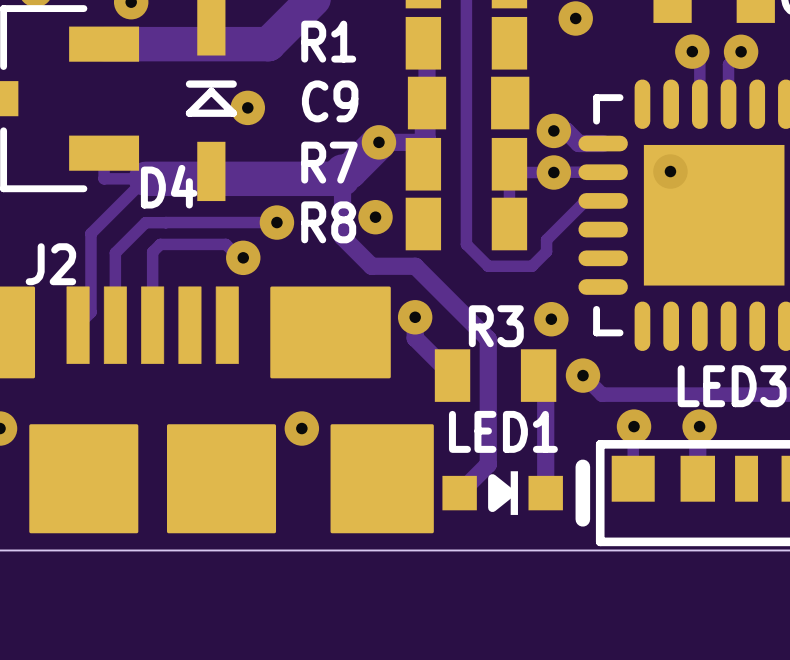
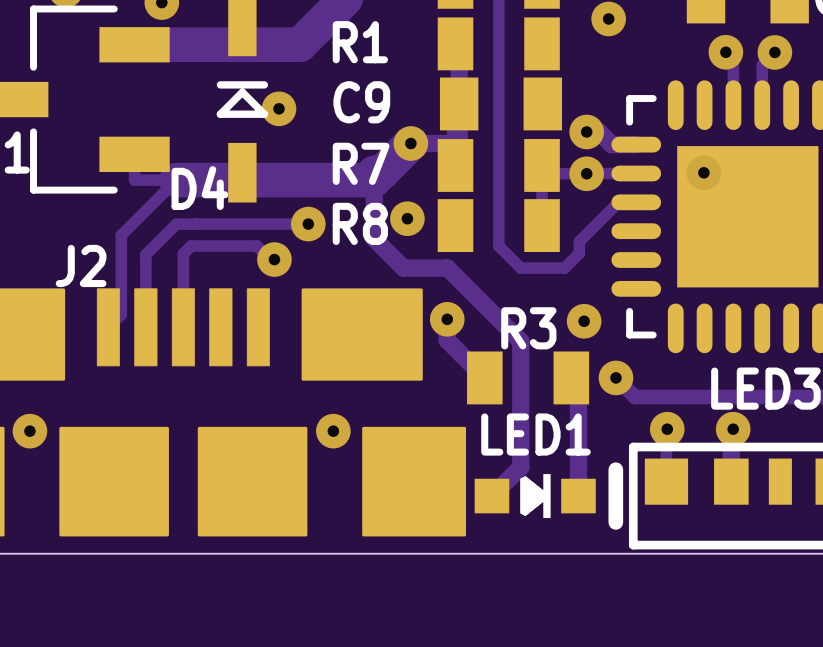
LED1 footprint: [442, 459, 591, 527] -> [474, 462, 624, 530]

